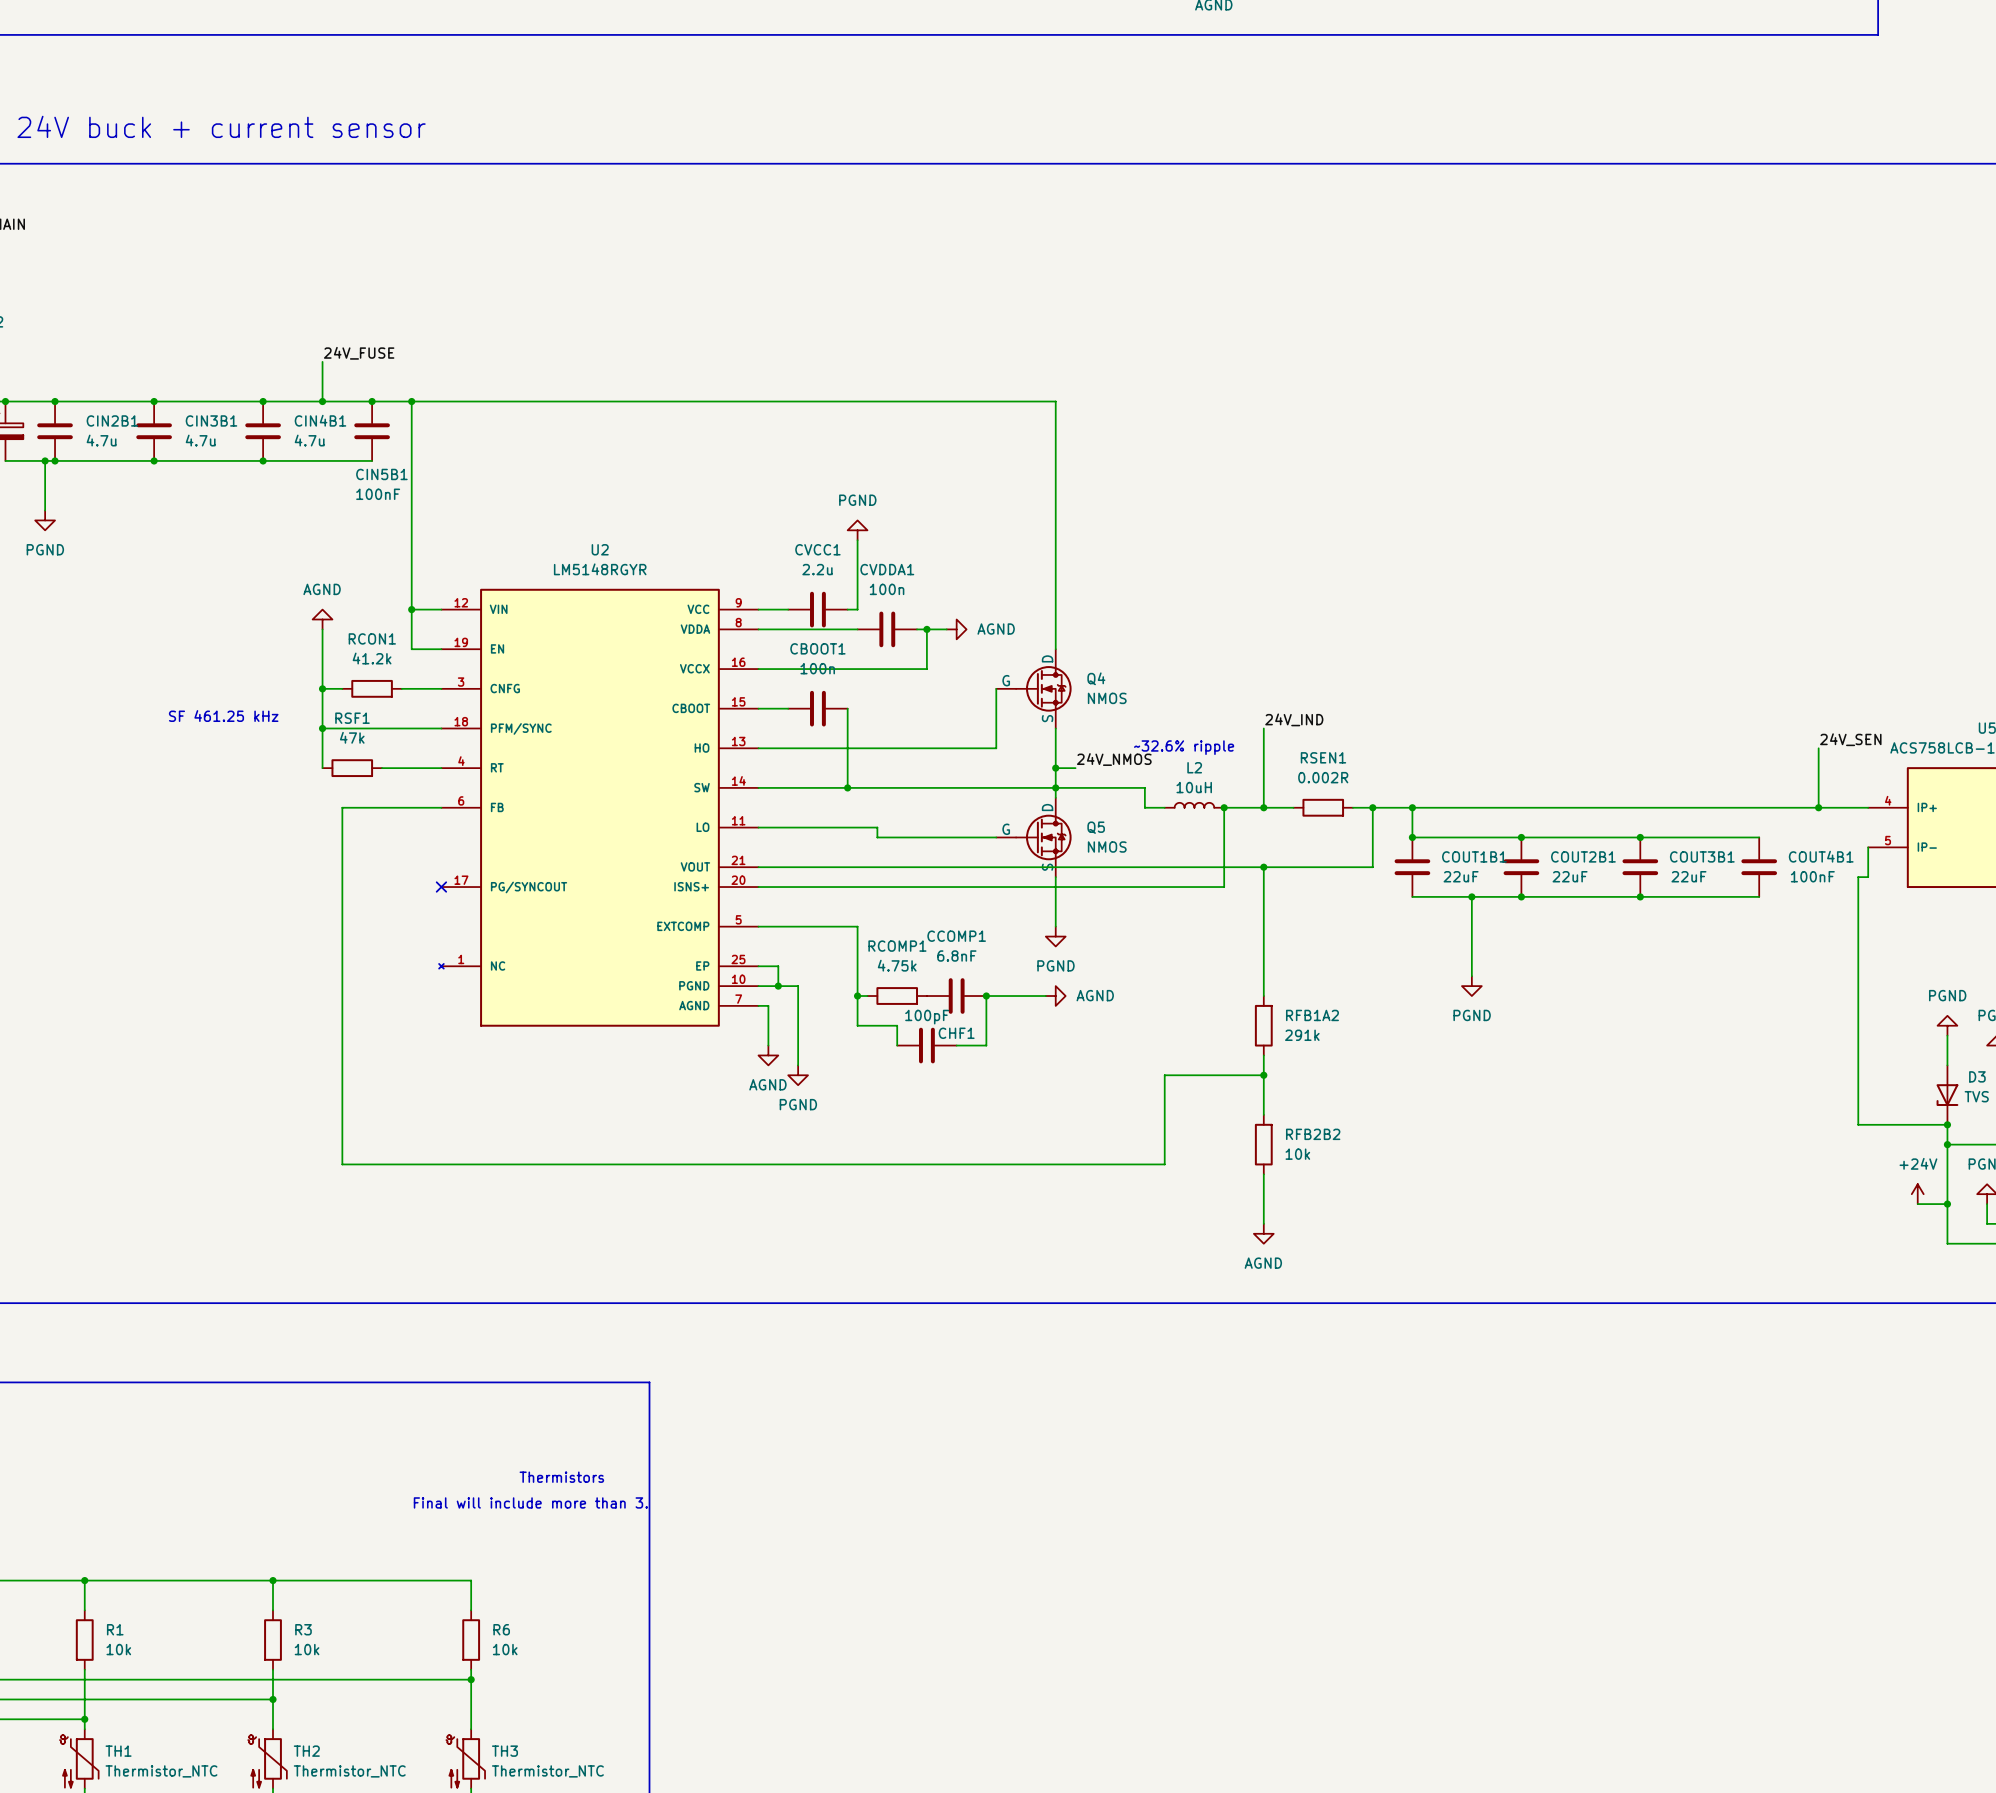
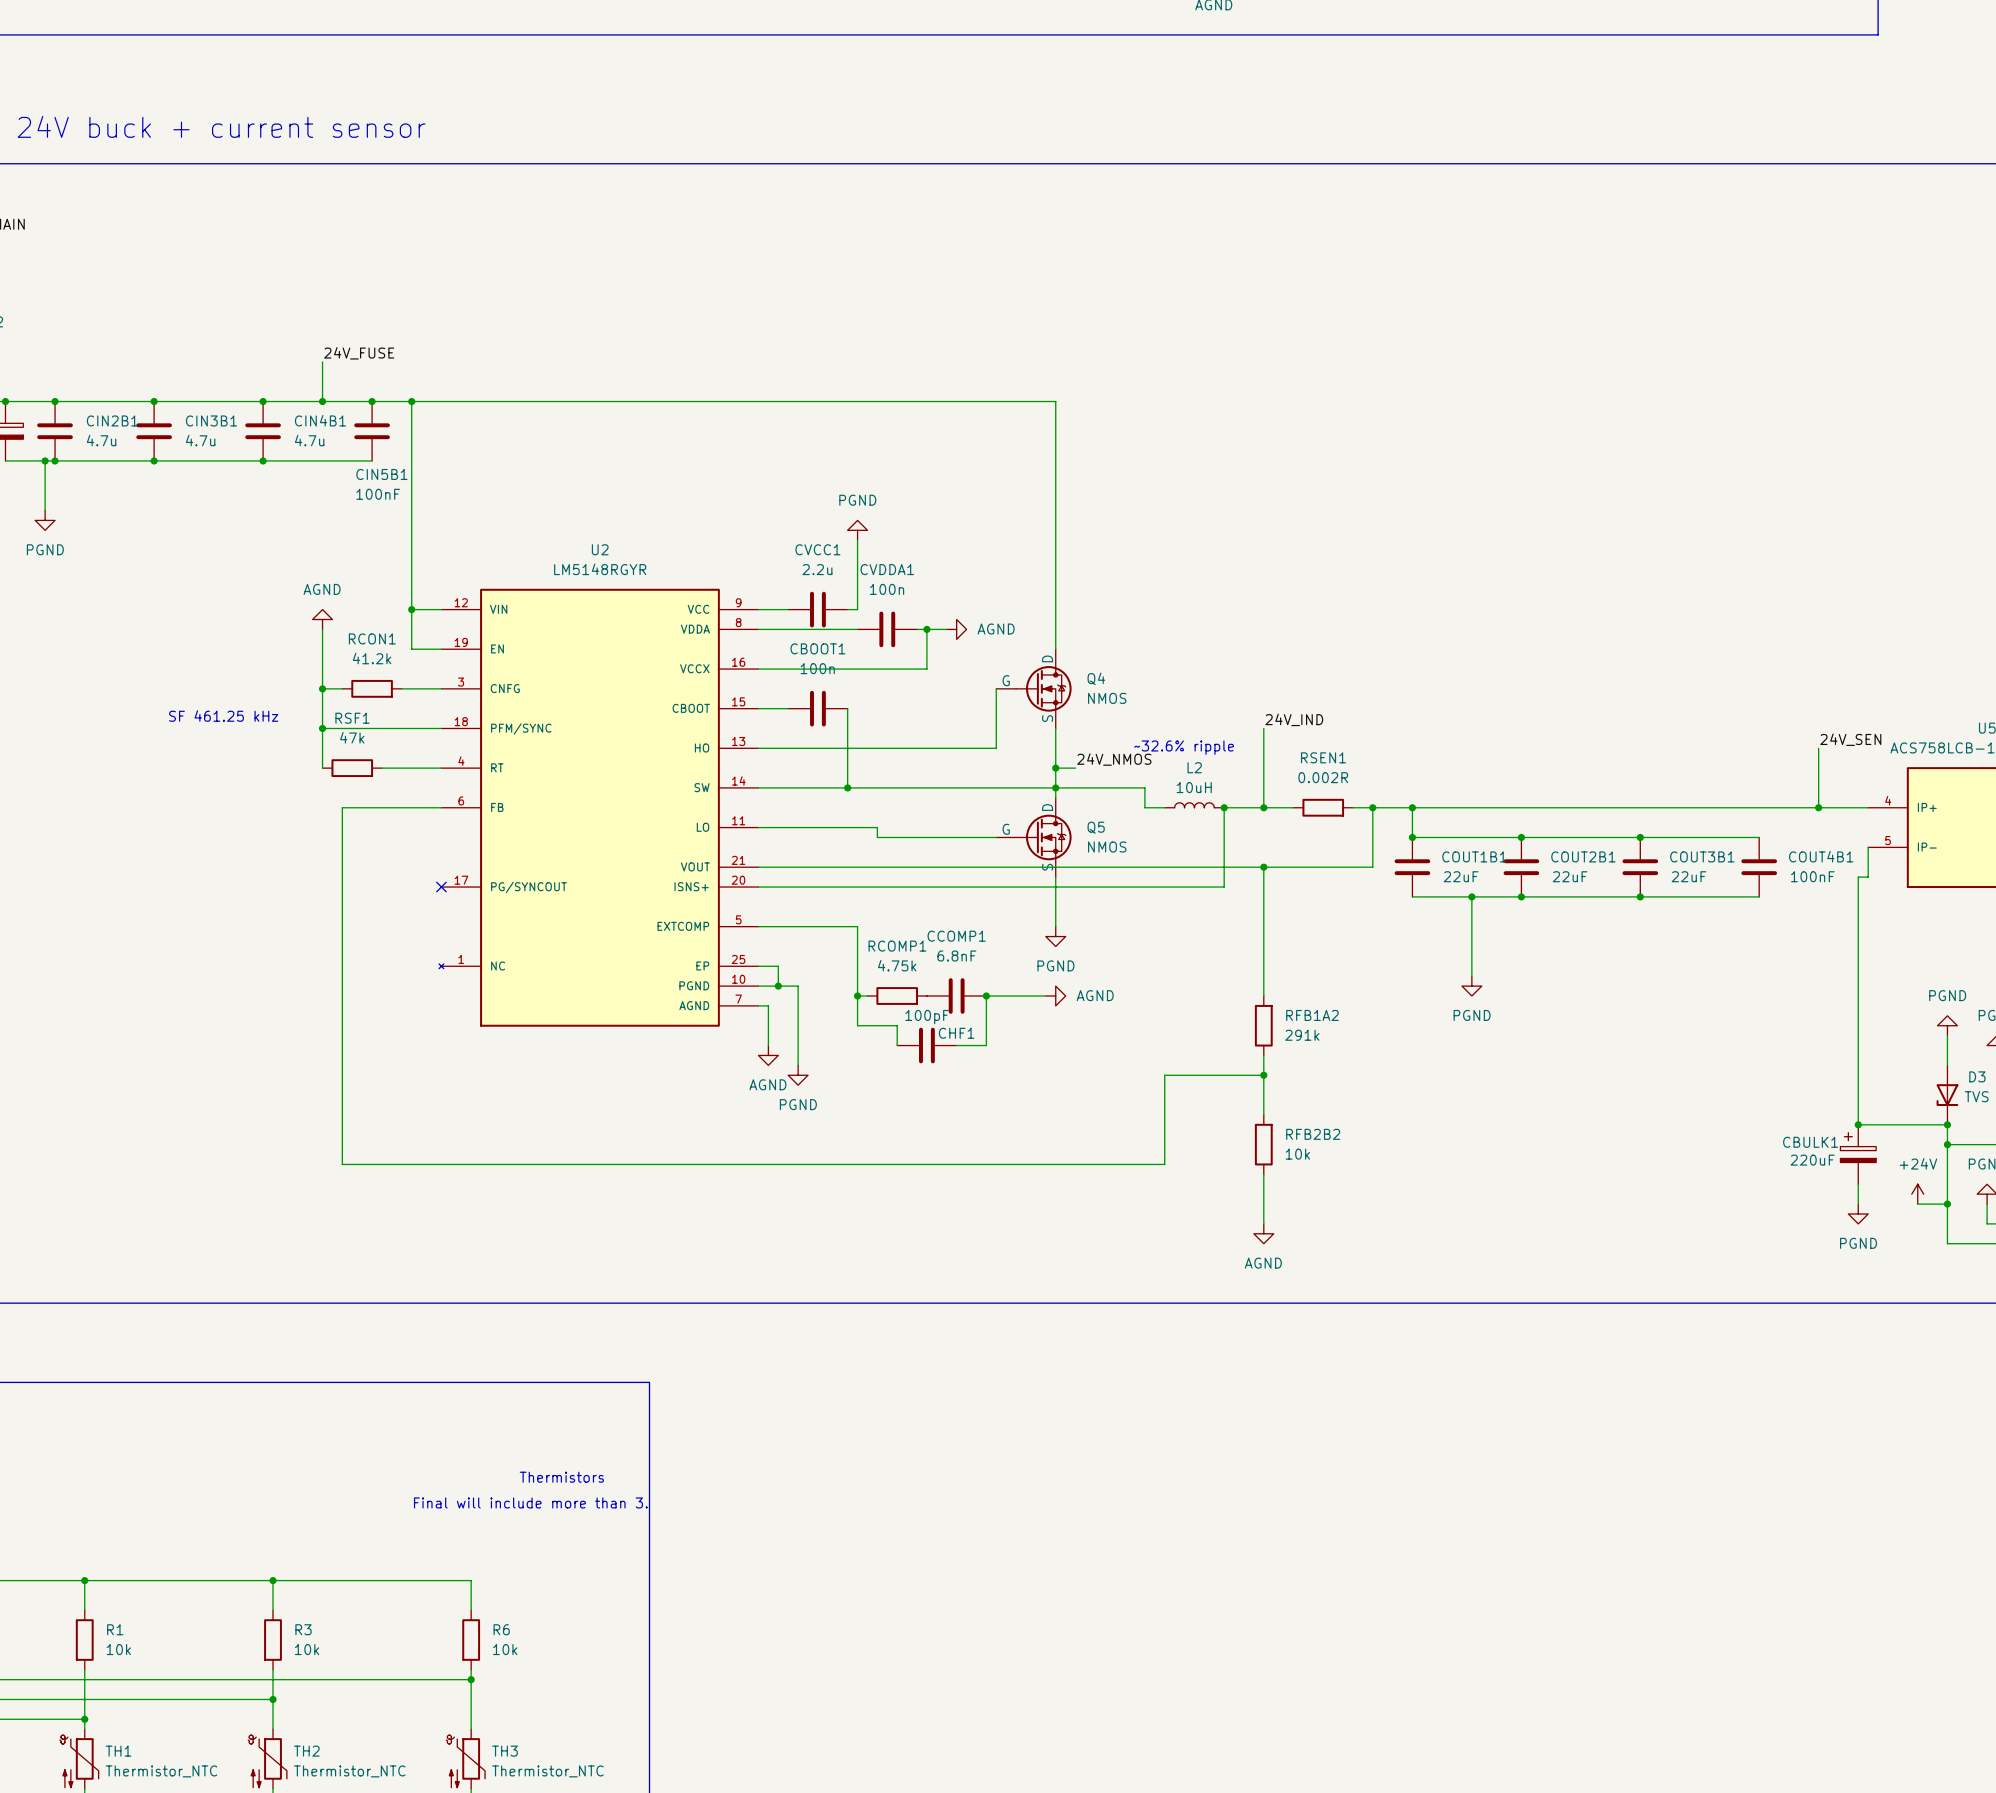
junction: none -> (1858, 1124)
CBULK1: none -> 220uF (1858, 1154)
wire: none -> (1858, 1184) (1858, 1204)
power symbol: none -> PGND (1858, 1213)

